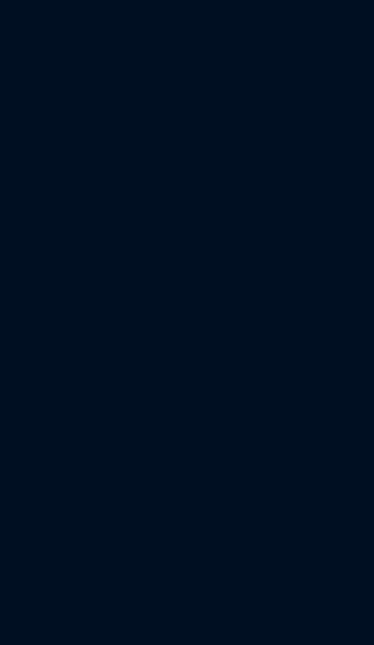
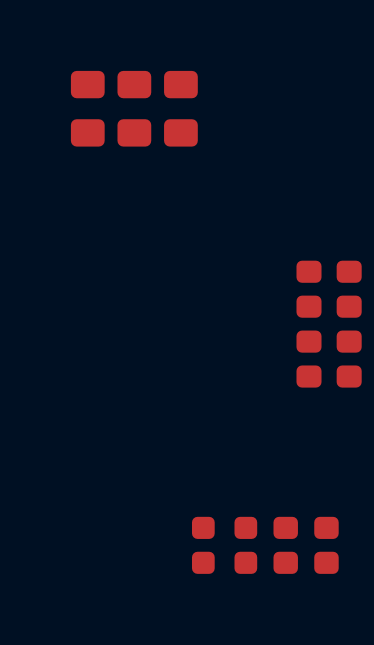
part: none -> (87, 108)
part: none -> (134, 108)
part: none -> (180, 108)
part: none -> (329, 271)
part: none -> (329, 306)
part: none -> (329, 341)
part: none -> (329, 376)
part: none -> (224, 527)
part: none -> (306, 527)
part: none -> (224, 562)
part: none -> (306, 562)

